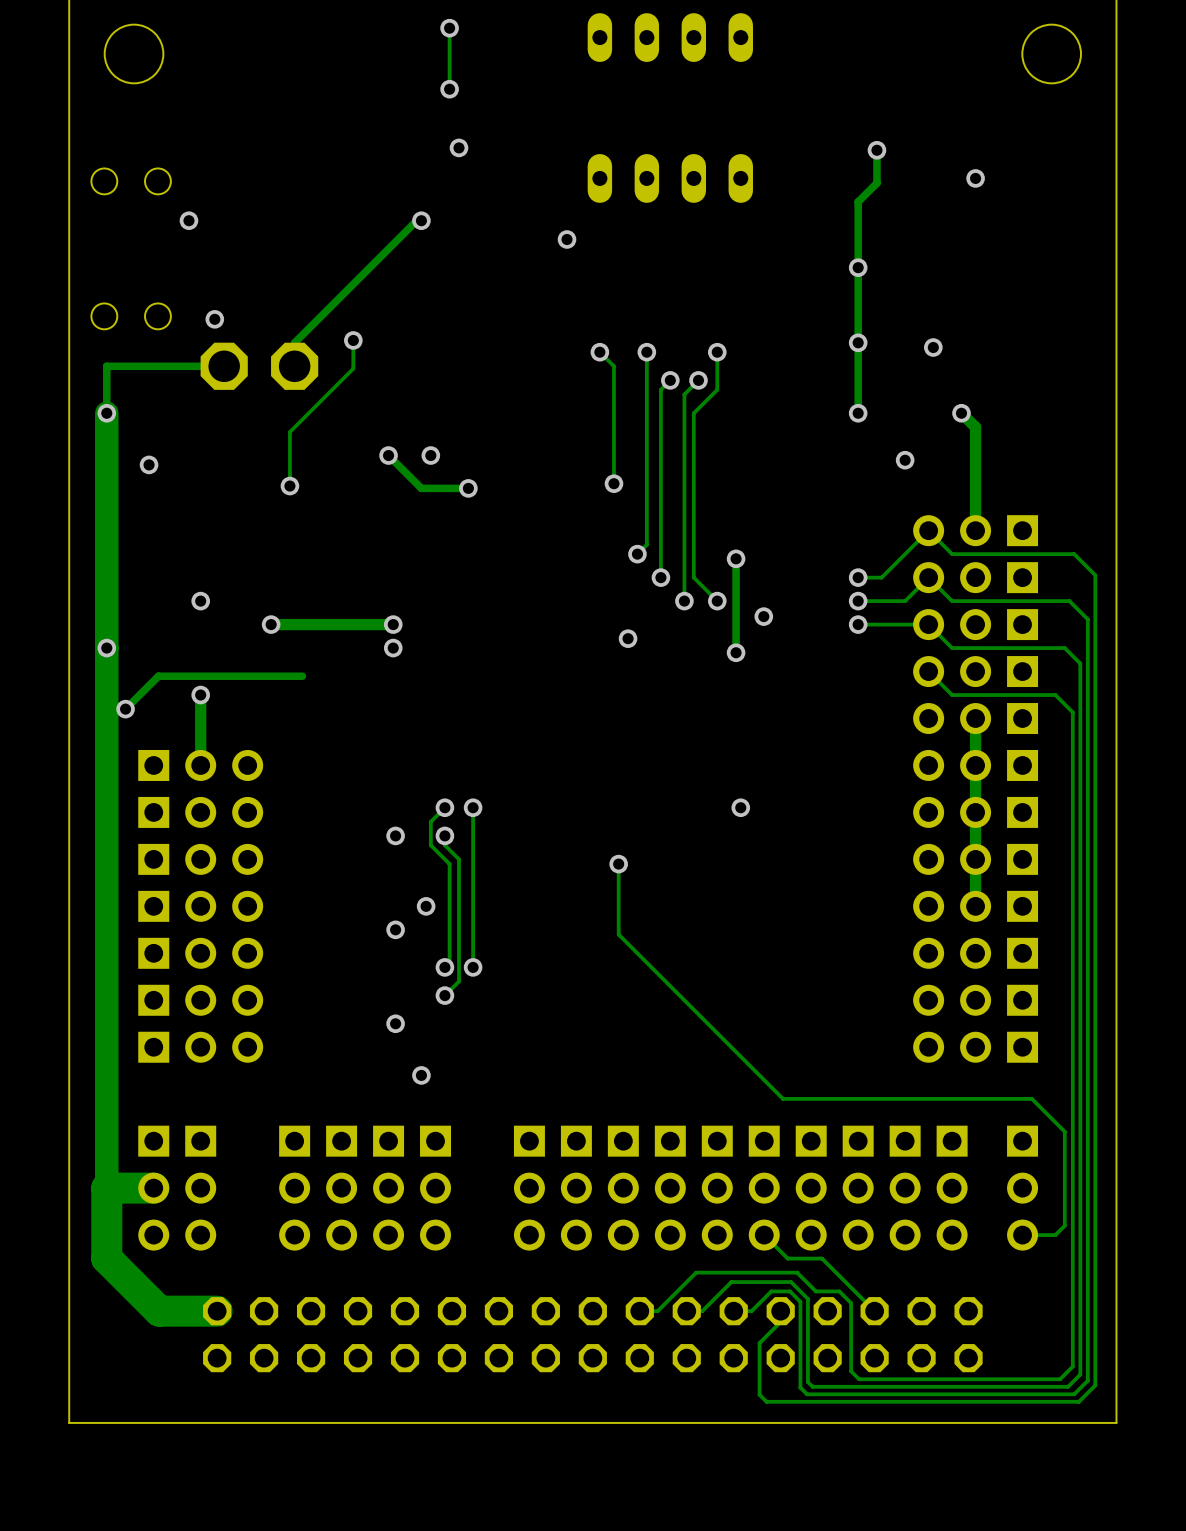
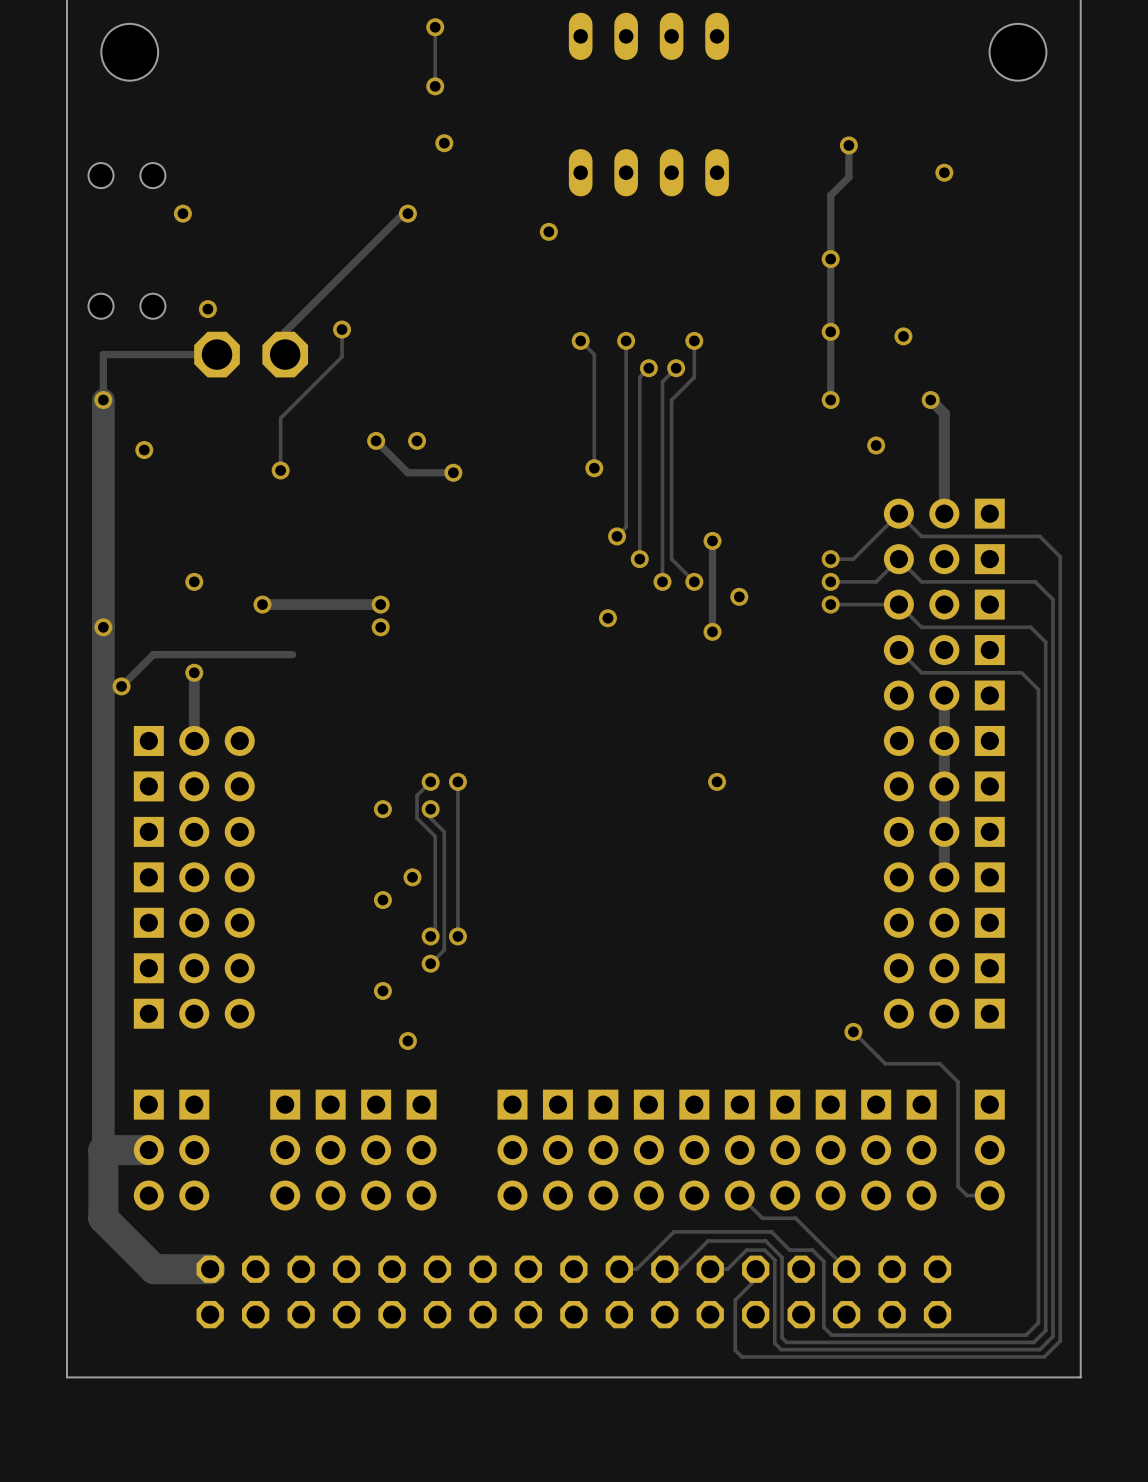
track: (618, 864) (618, 934) (783, 1098) (914, 1098) -> (853, 1031) (885, 1063)
via: (618, 864) -> none
via: none -> (853, 1031)
track: (970, 1098) (1031, 1098) (1064, 1131) (1064, 1225) (1055, 1235) (1022, 1235) -> (939, 1063) (957, 1081) (957, 1186) (967, 1195) (989, 1195)

